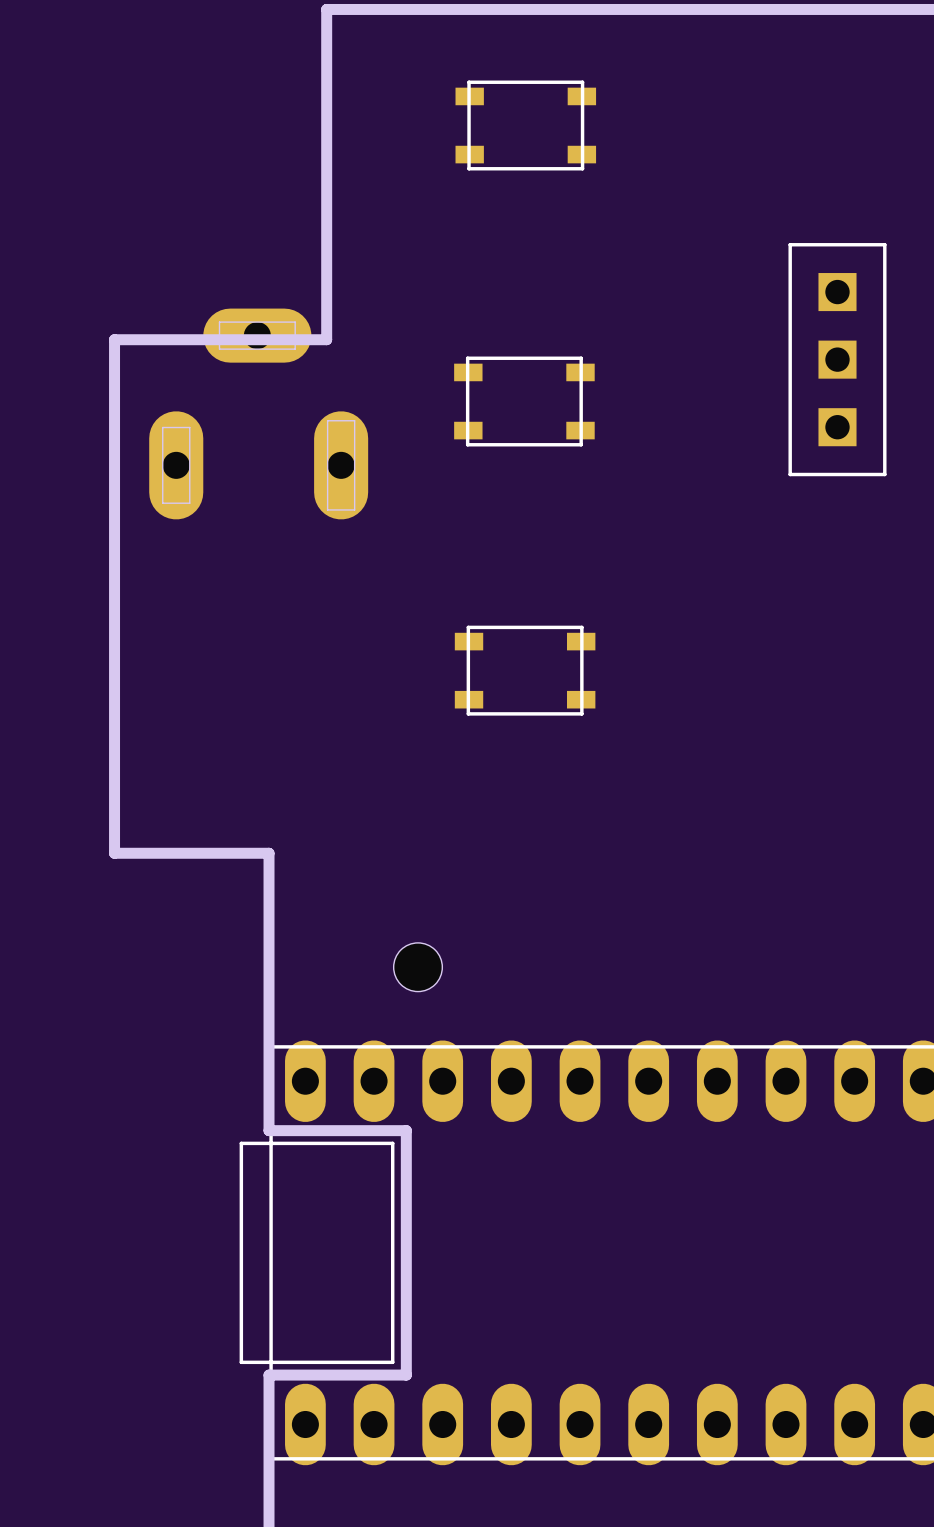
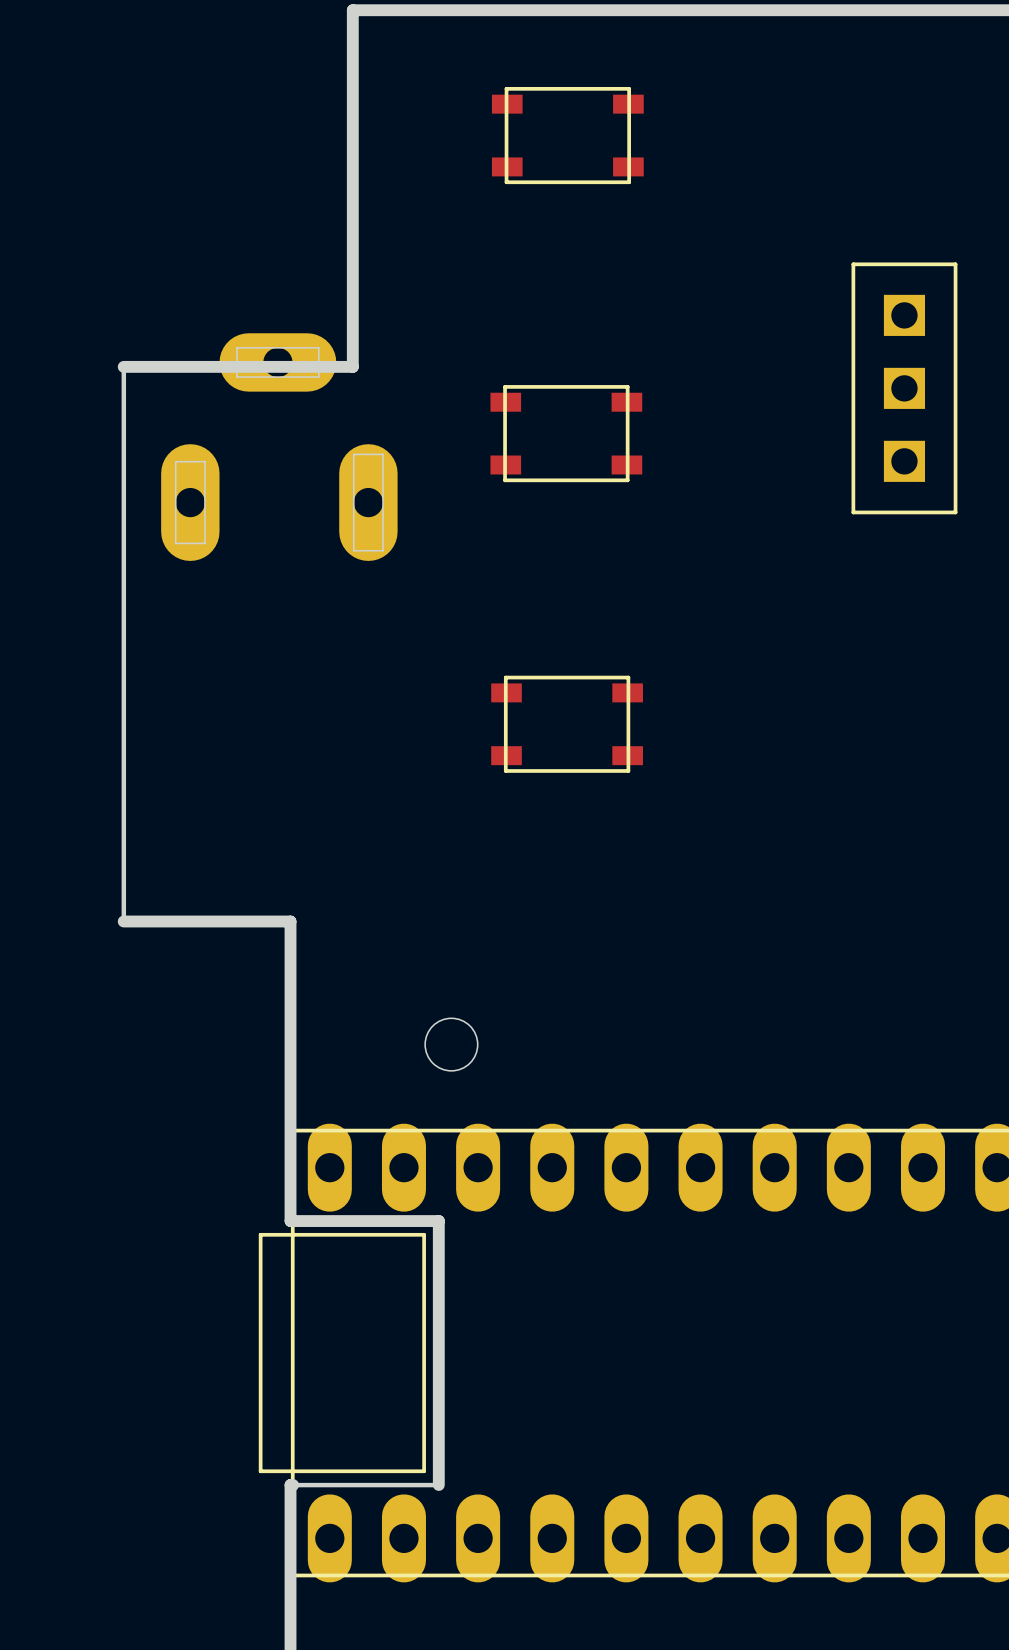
board edge width: thick (114, 339) (114, 853) -> thin (123, 366) (123, 921)
board edge width: thick (269, 1375) (406, 1375) -> thin (290, 1485) (438, 1485)

